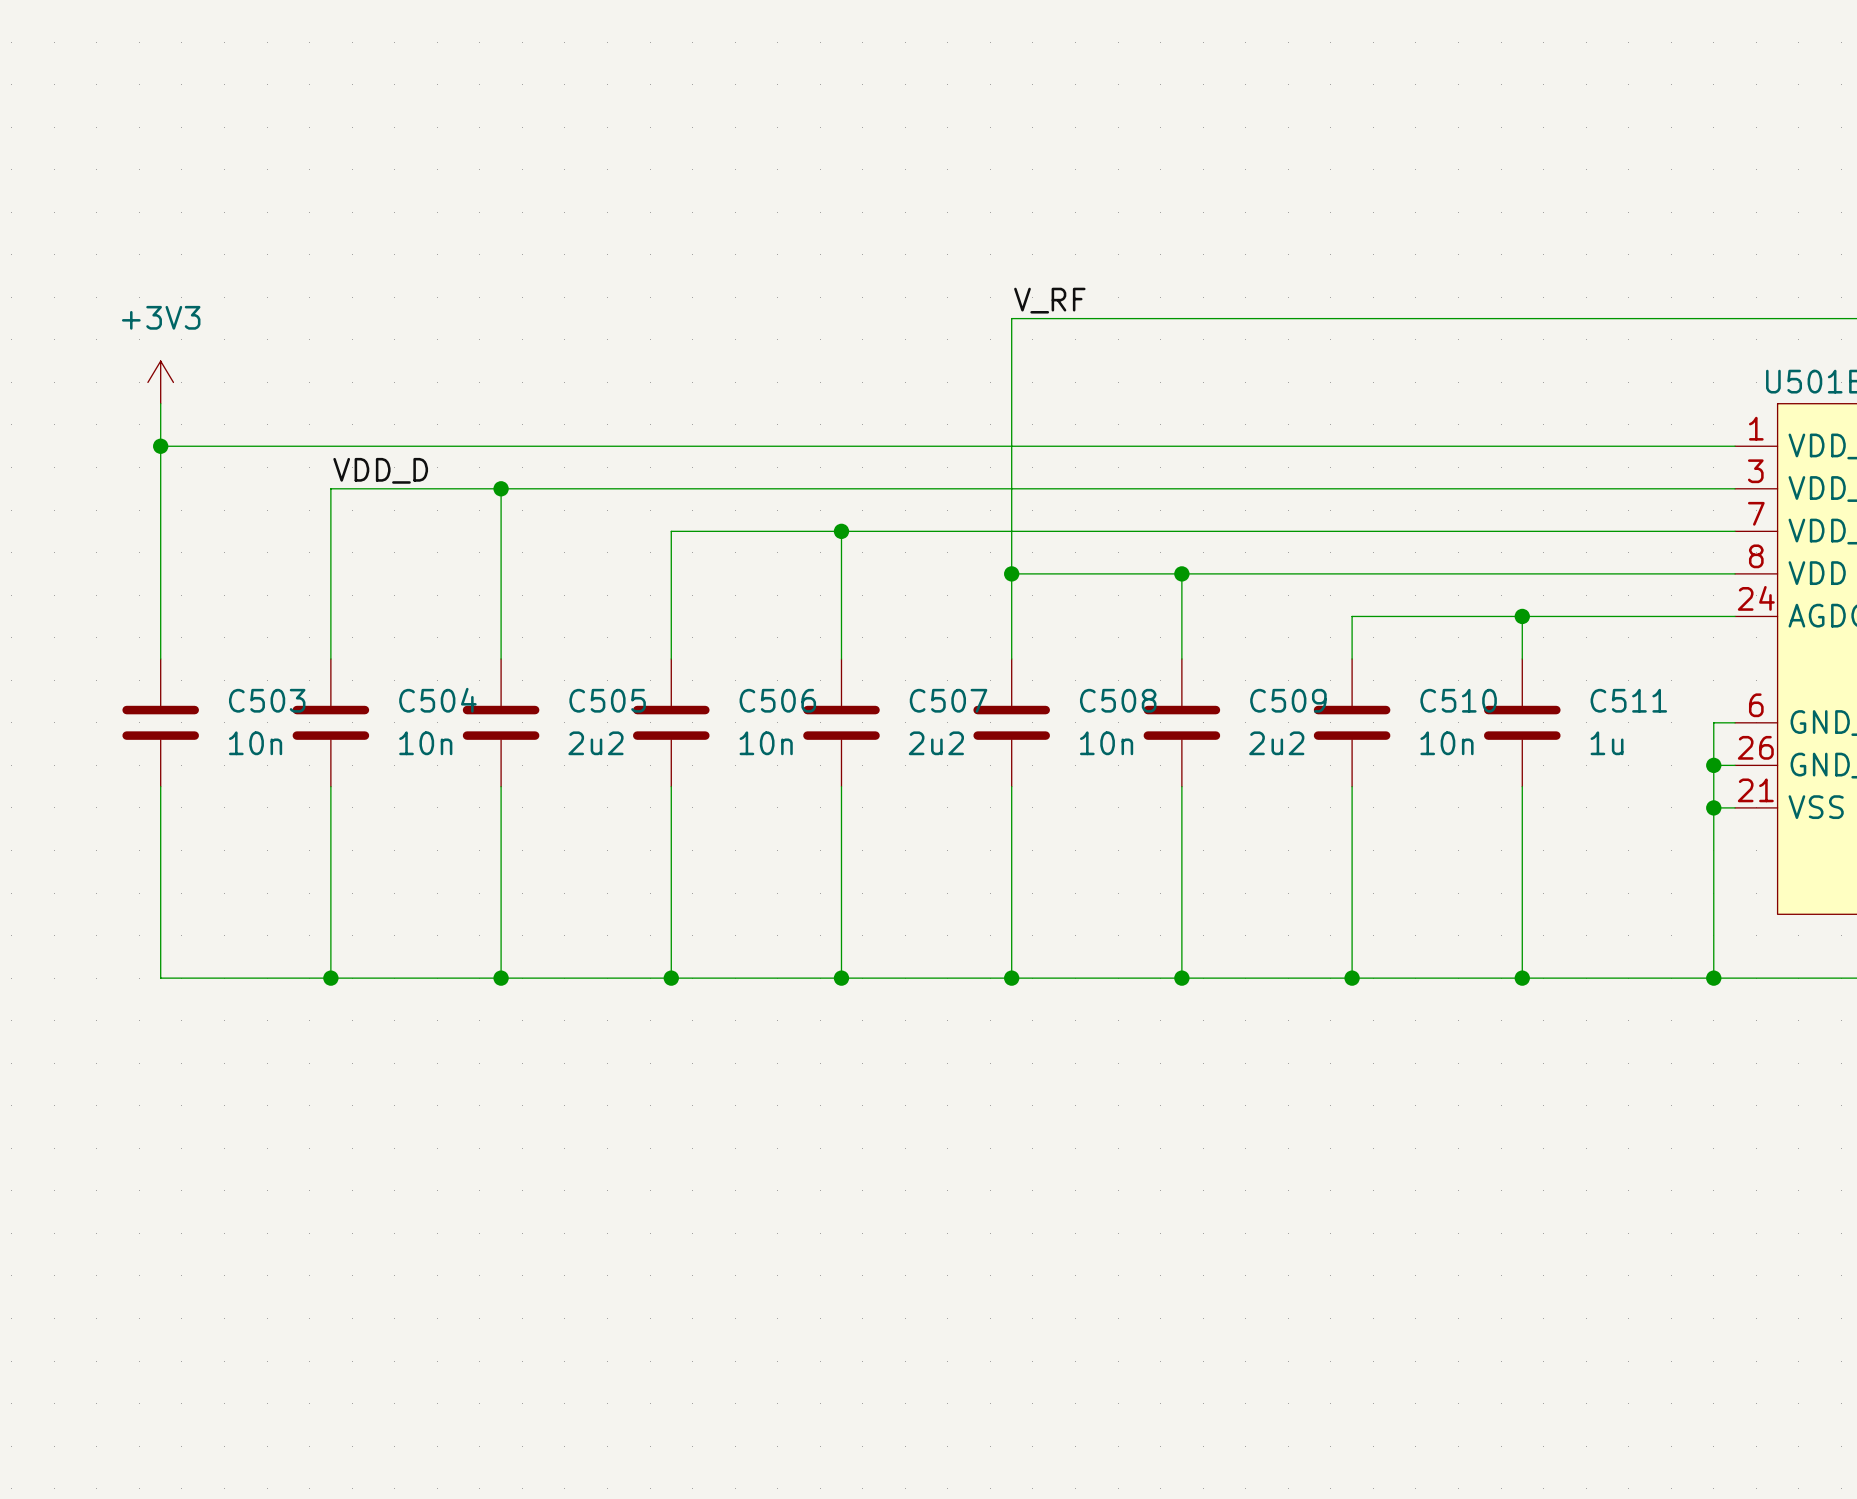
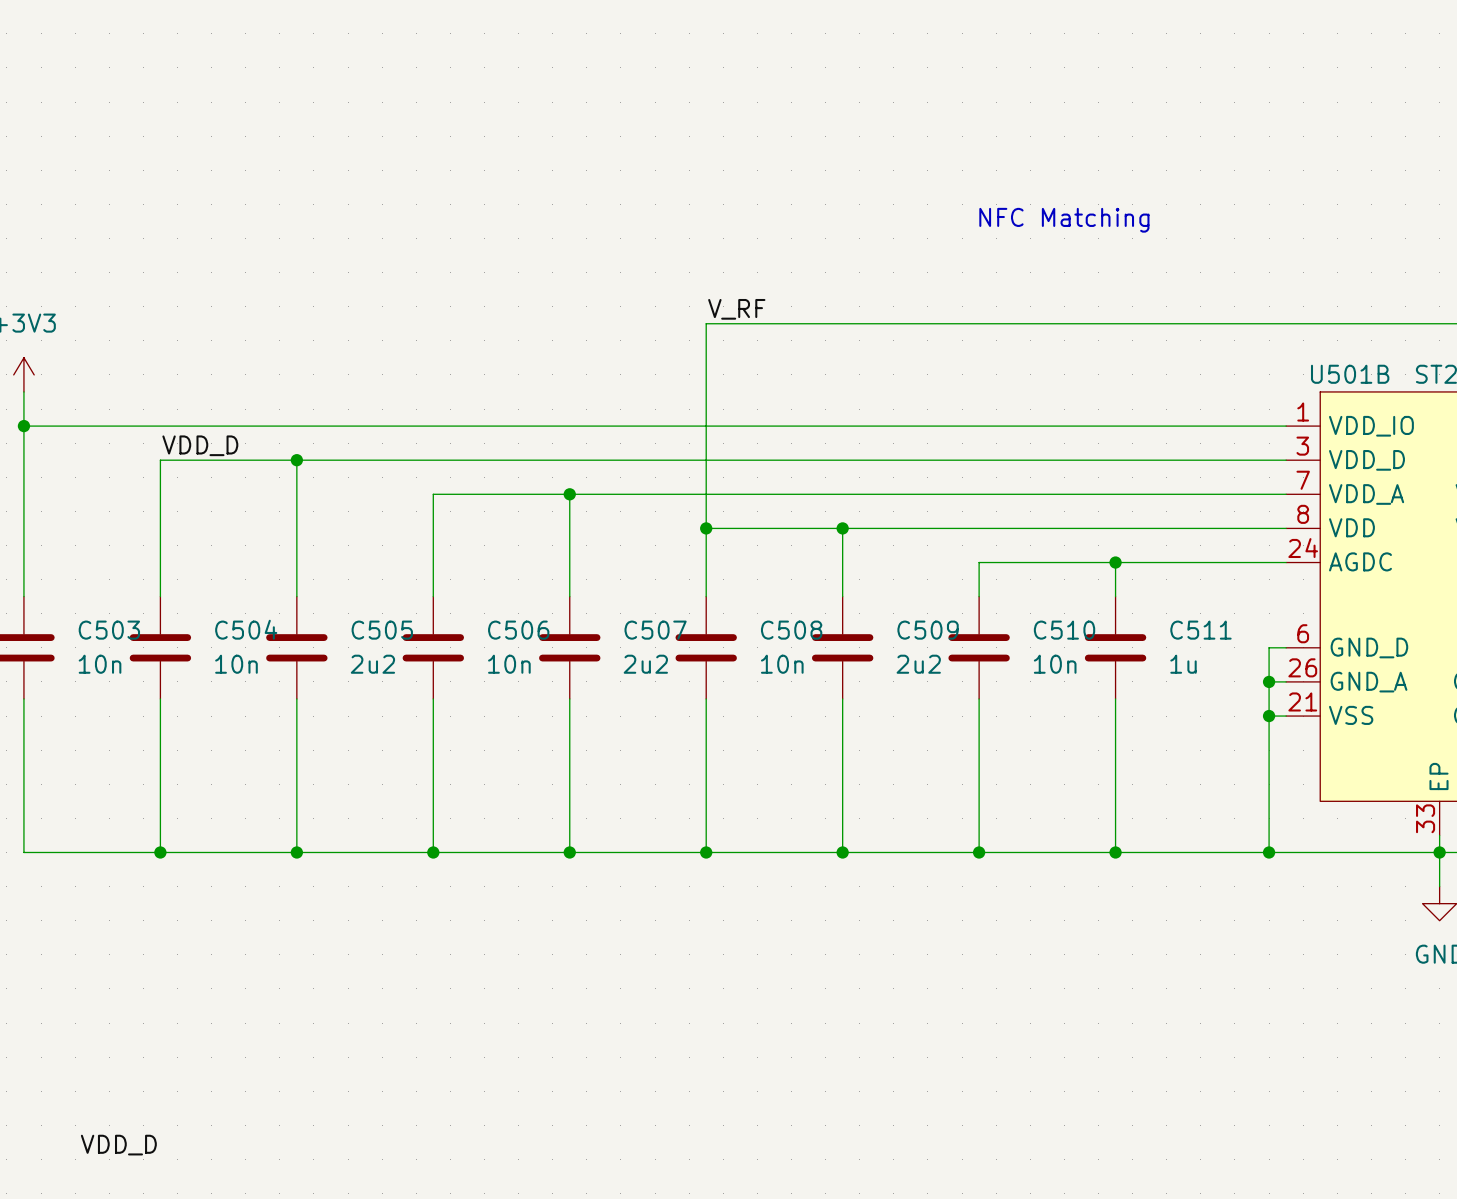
text: none -> NFC Matching (1064, 220)
label: none -> VDD_D (118, 1145)

